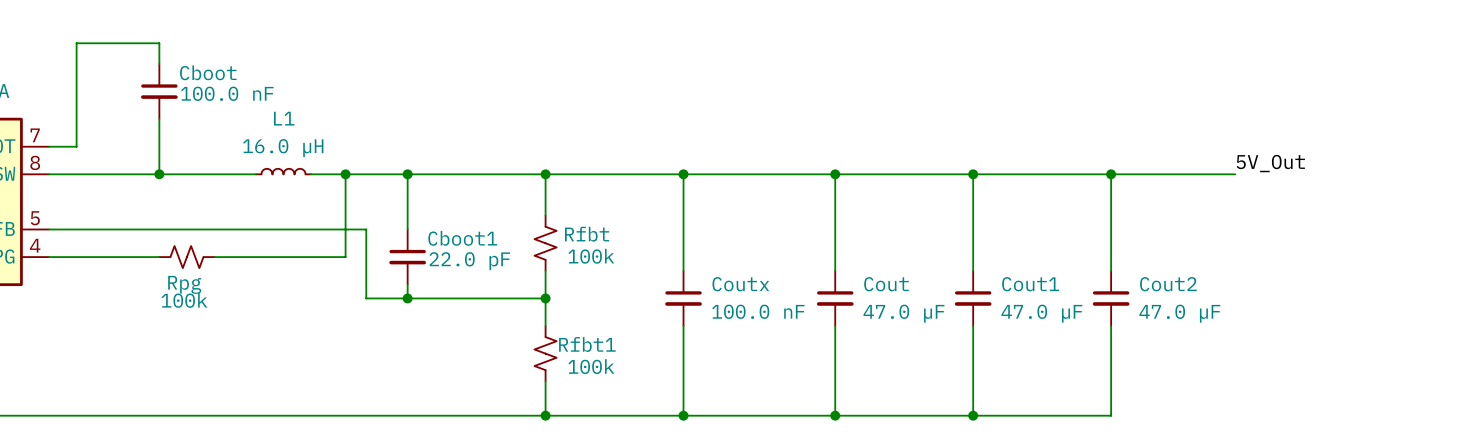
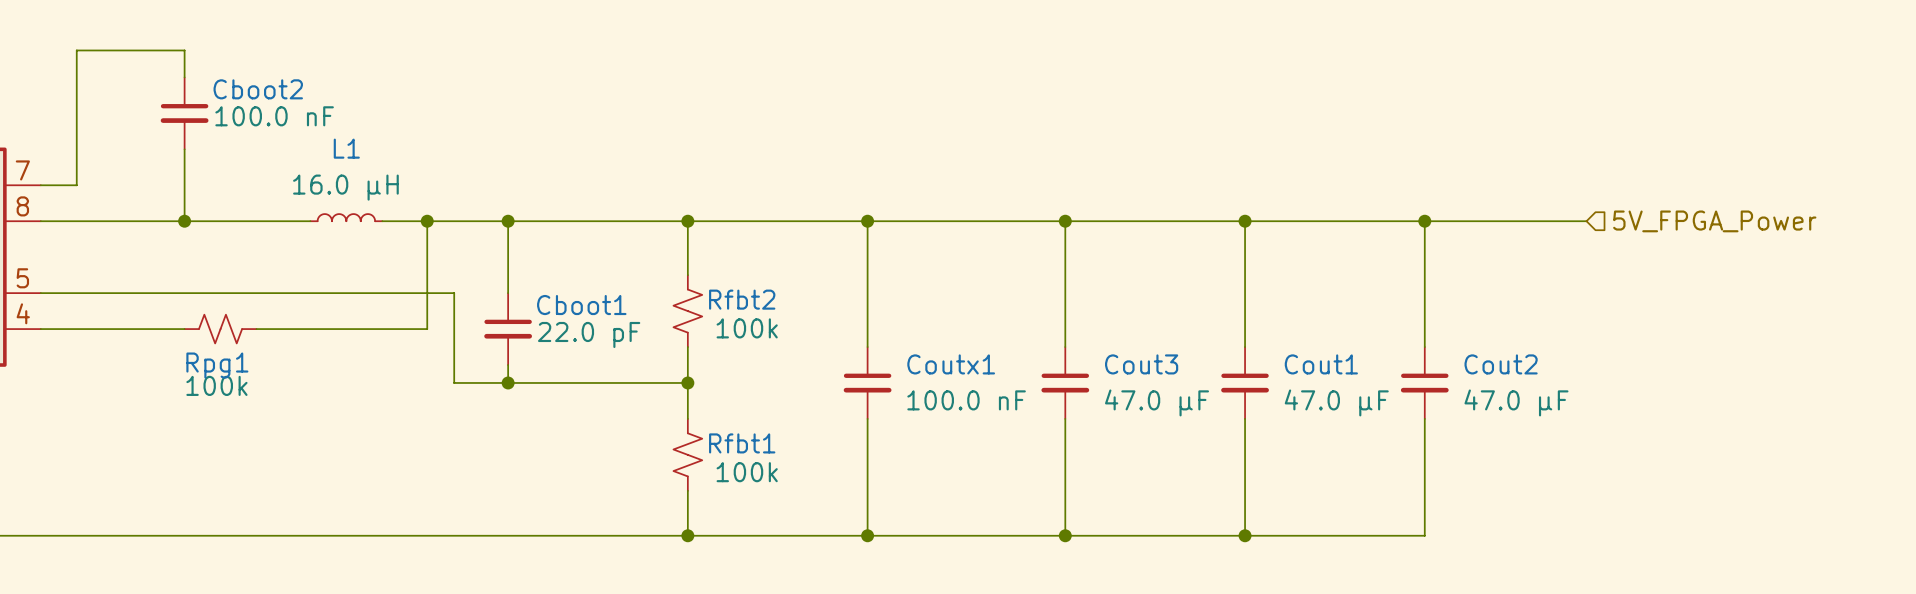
Cboot name: Cboot (208, 72) -> Cboot2 (258, 89)
label: 5V_Out (1270, 163) -> none
hierarchical label: none -> 5V_FPGA_Power (1714, 221)
Rfbt name: Rfbt (587, 234) -> Rfbt2 (742, 299)
Rpg name: Rpg (184, 284) -> Rpg1 (217, 365)
Coutx name: Coutx (740, 284) -> Coutx1 (951, 364)
Cout name: Cout (886, 284) -> Cout3 (1141, 364)

